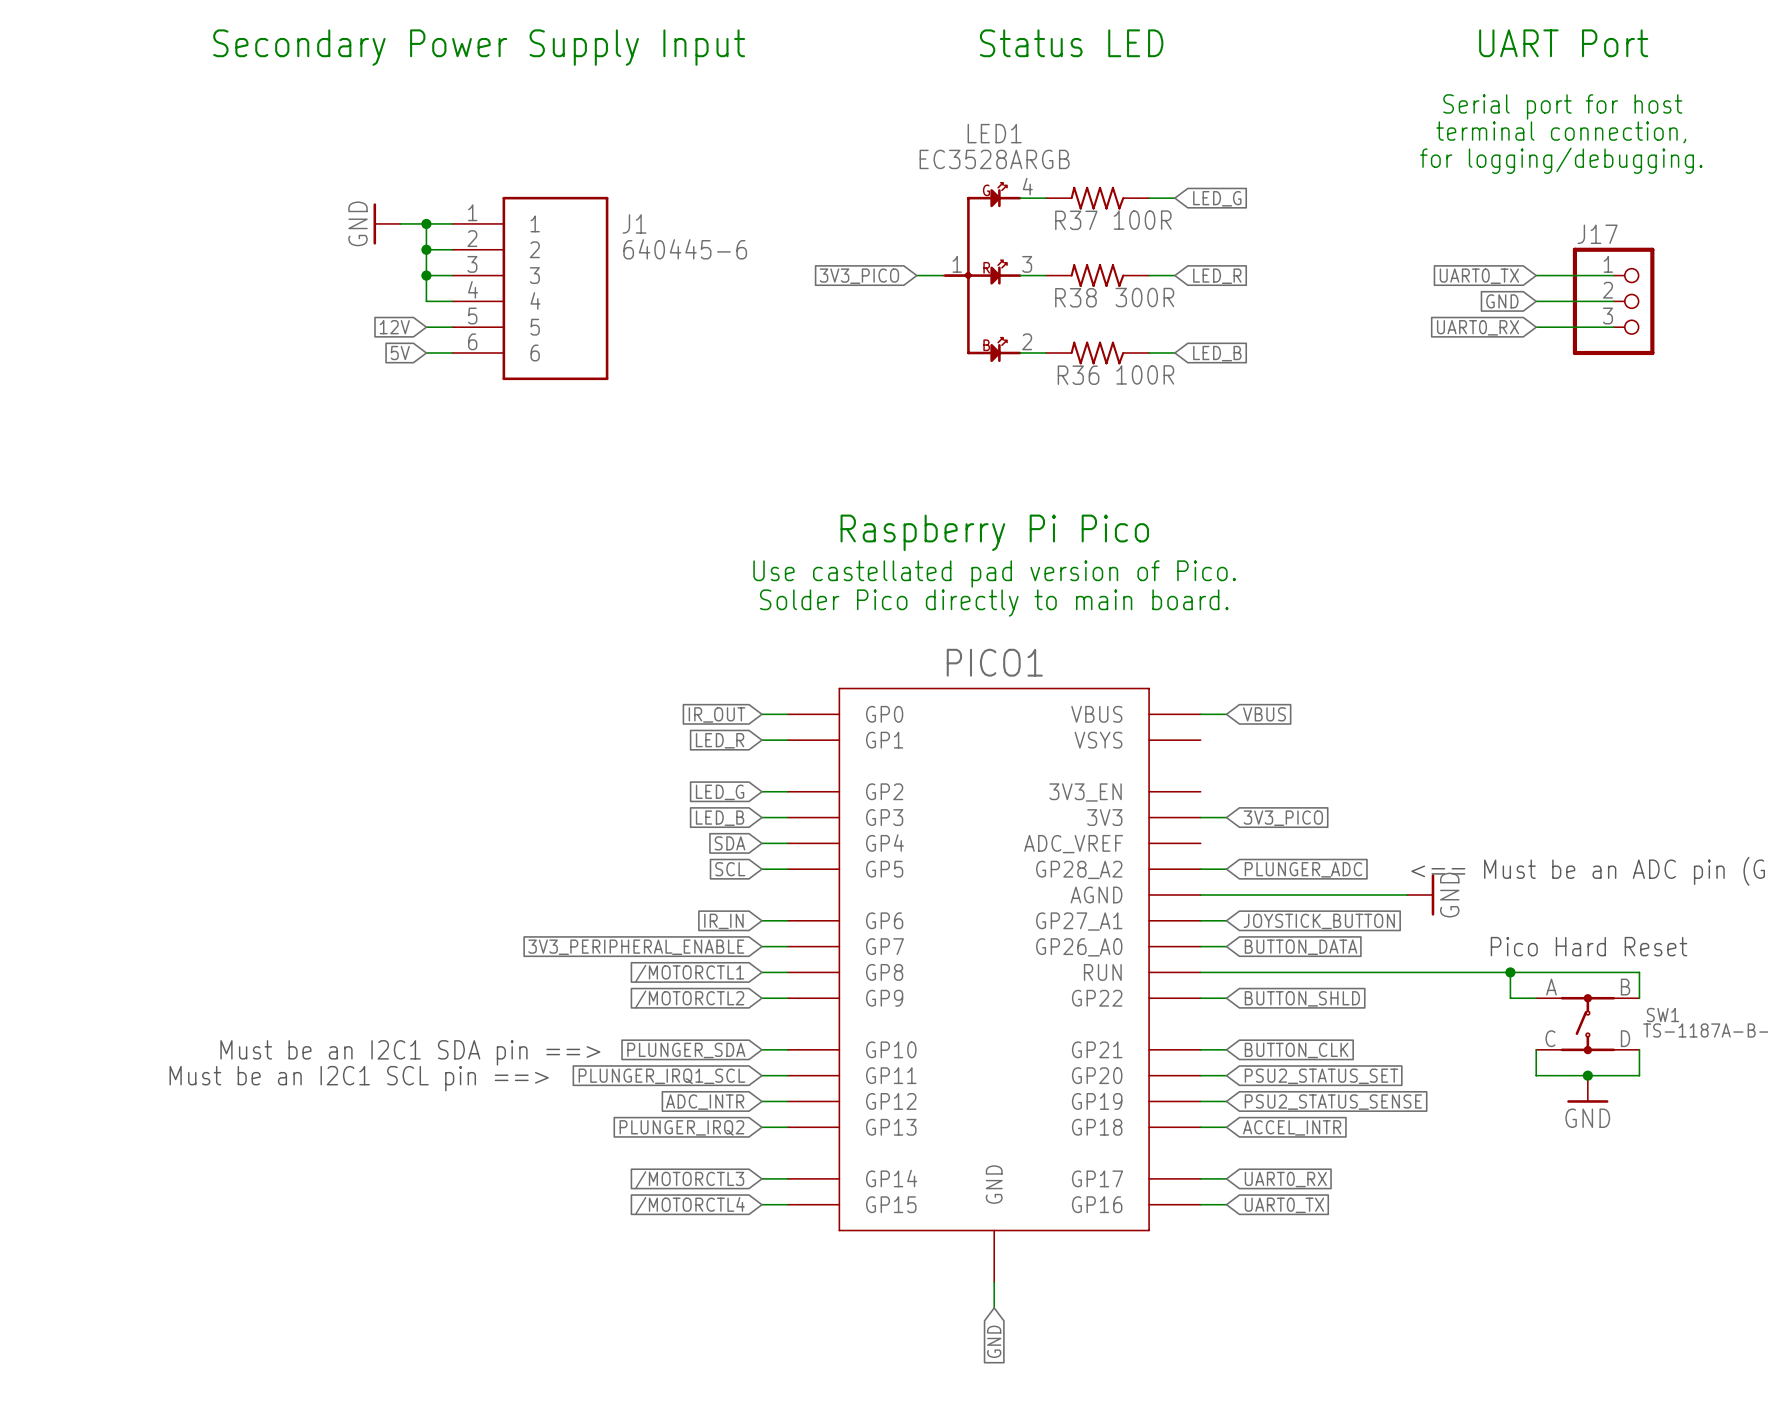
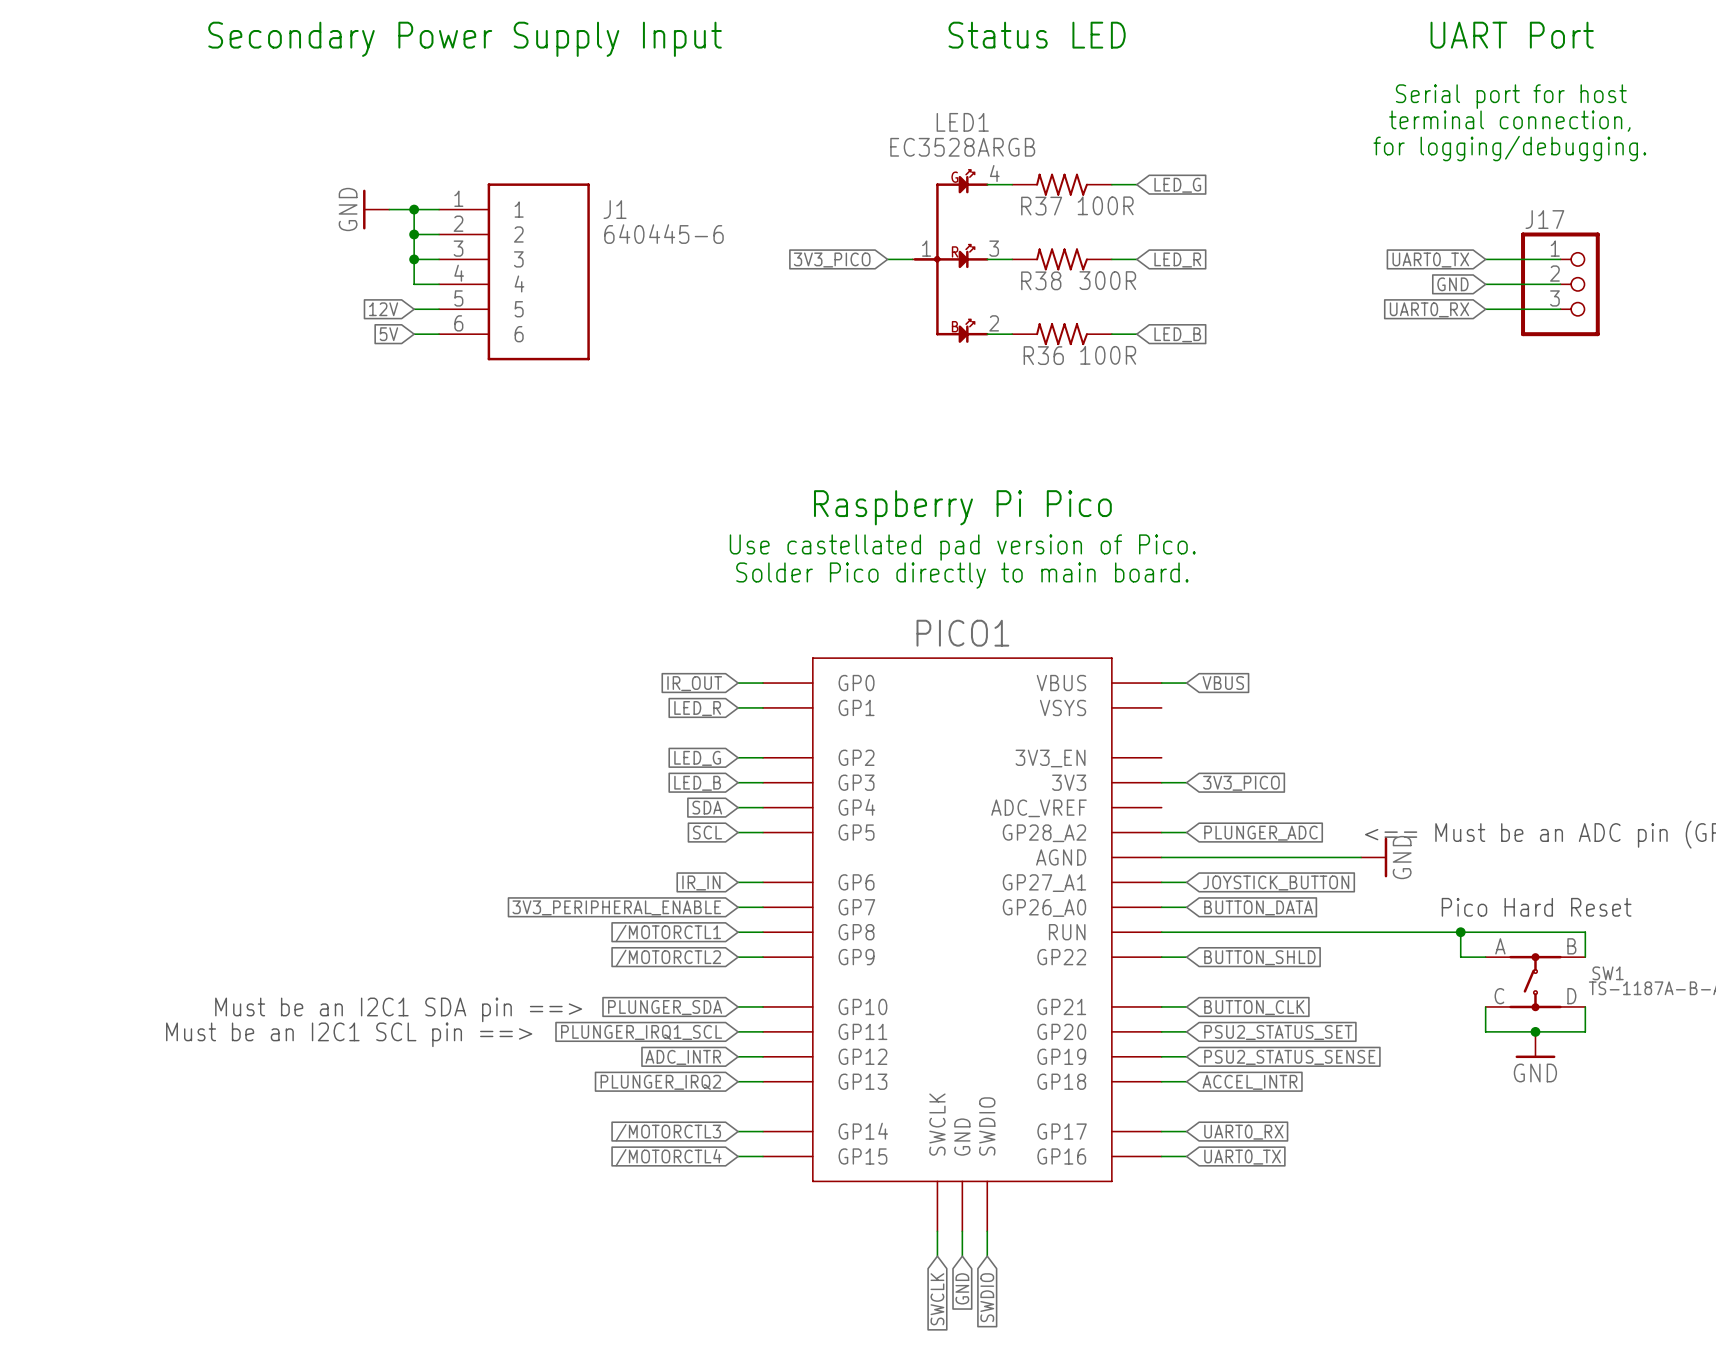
PICO1 symbol: [787, 687, 1201, 1283] -> [763, 657, 1162, 1232]
wire: none -> (937, 1231) (937, 1256)
wire: none -> (987, 1231) (987, 1256)
global label: none -> SWDIO (987, 1297)
global label: none -> SWCLK (937, 1299)

